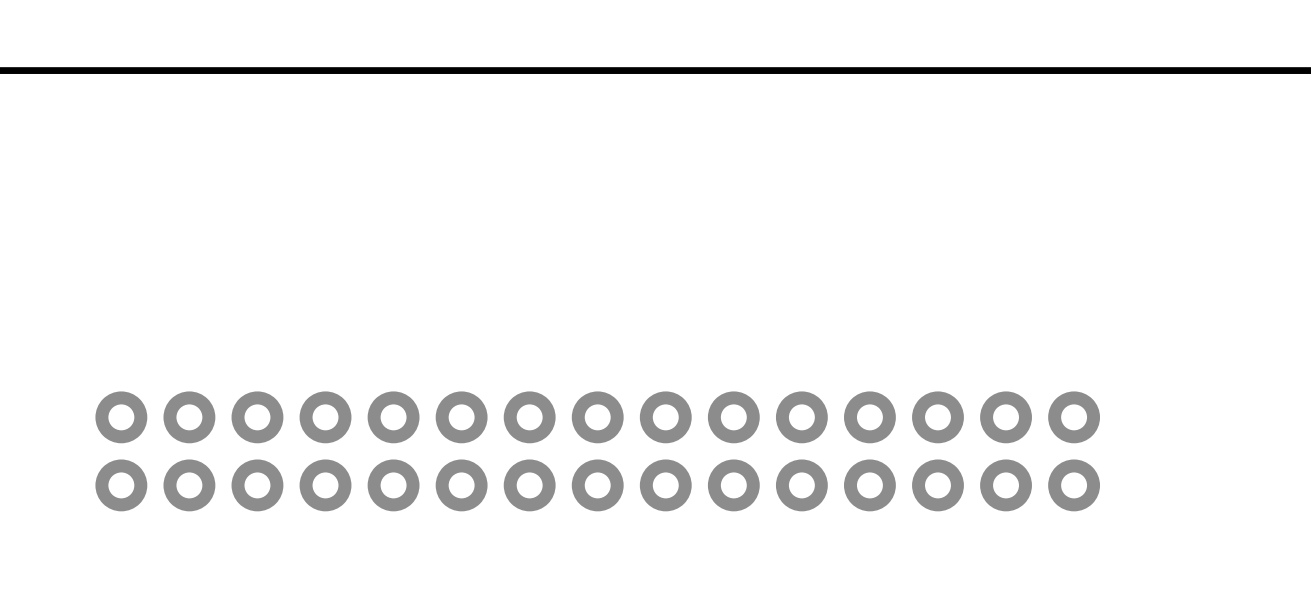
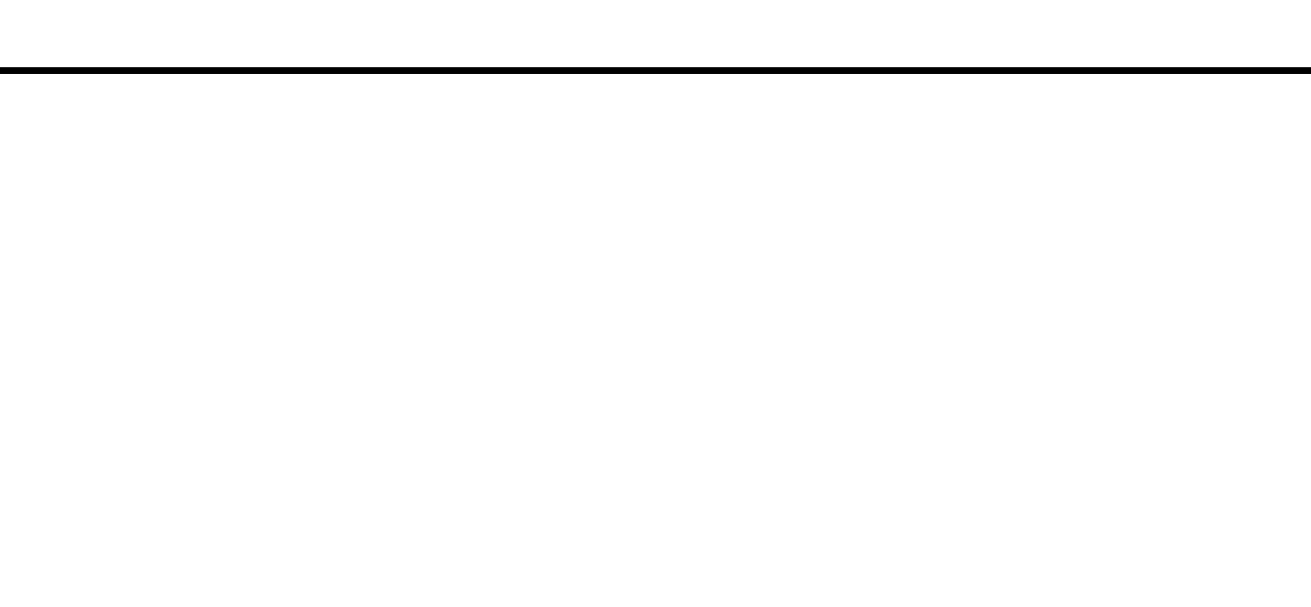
part: (597, 451) -> none

